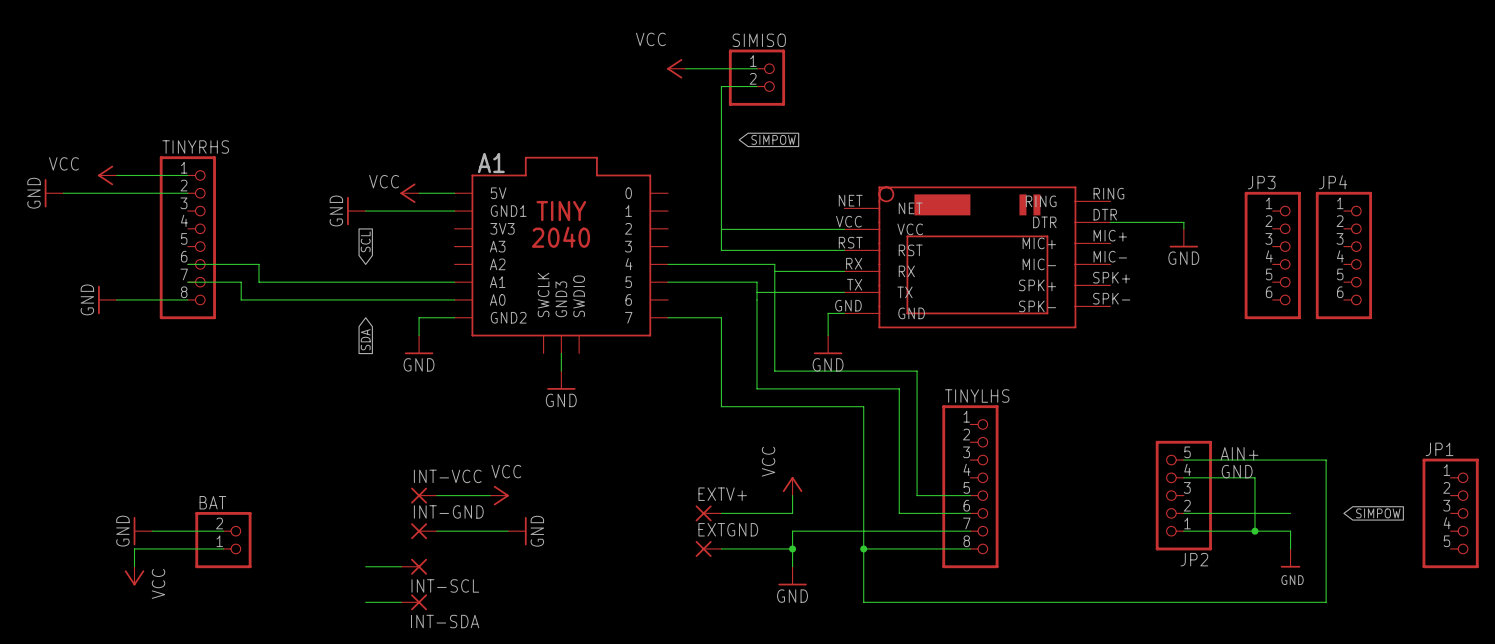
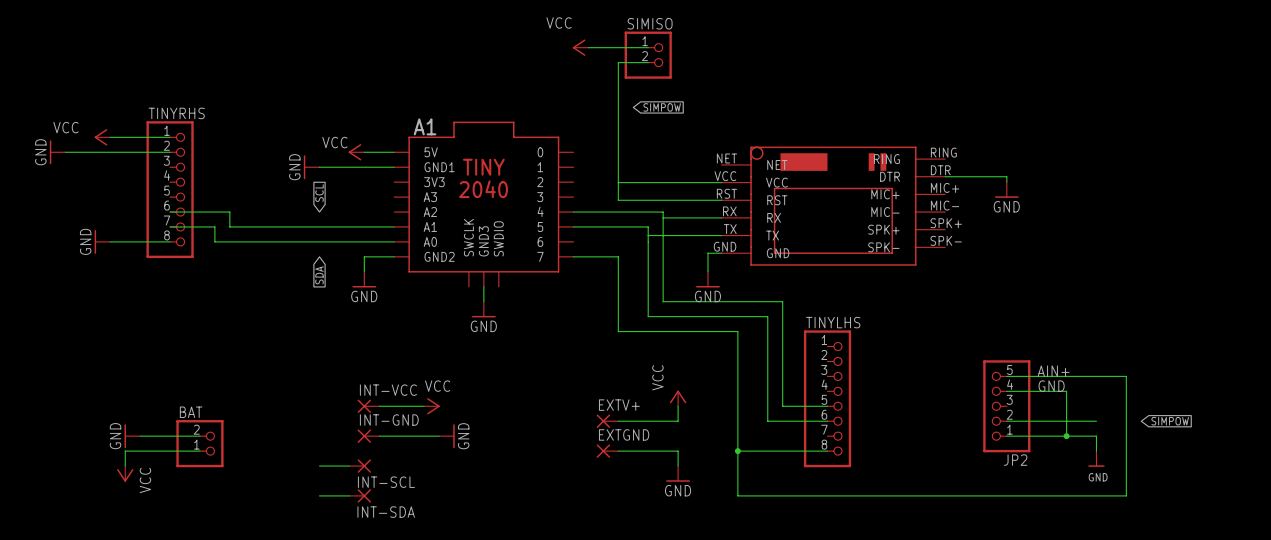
JP3: (1272, 255) -> none
JP4: (1343, 255) -> none
JP1: (1450, 513) -> none
wire: (970, 531) (792, 531) (792, 548) -> none
junction: (792, 548) -> none

